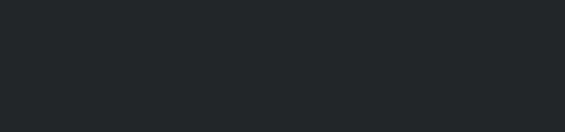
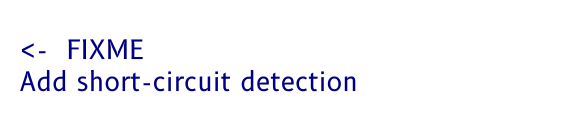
text: none -> <- FIXME (82, 49)
text: none -> Add short-circuit detection (187, 80)

